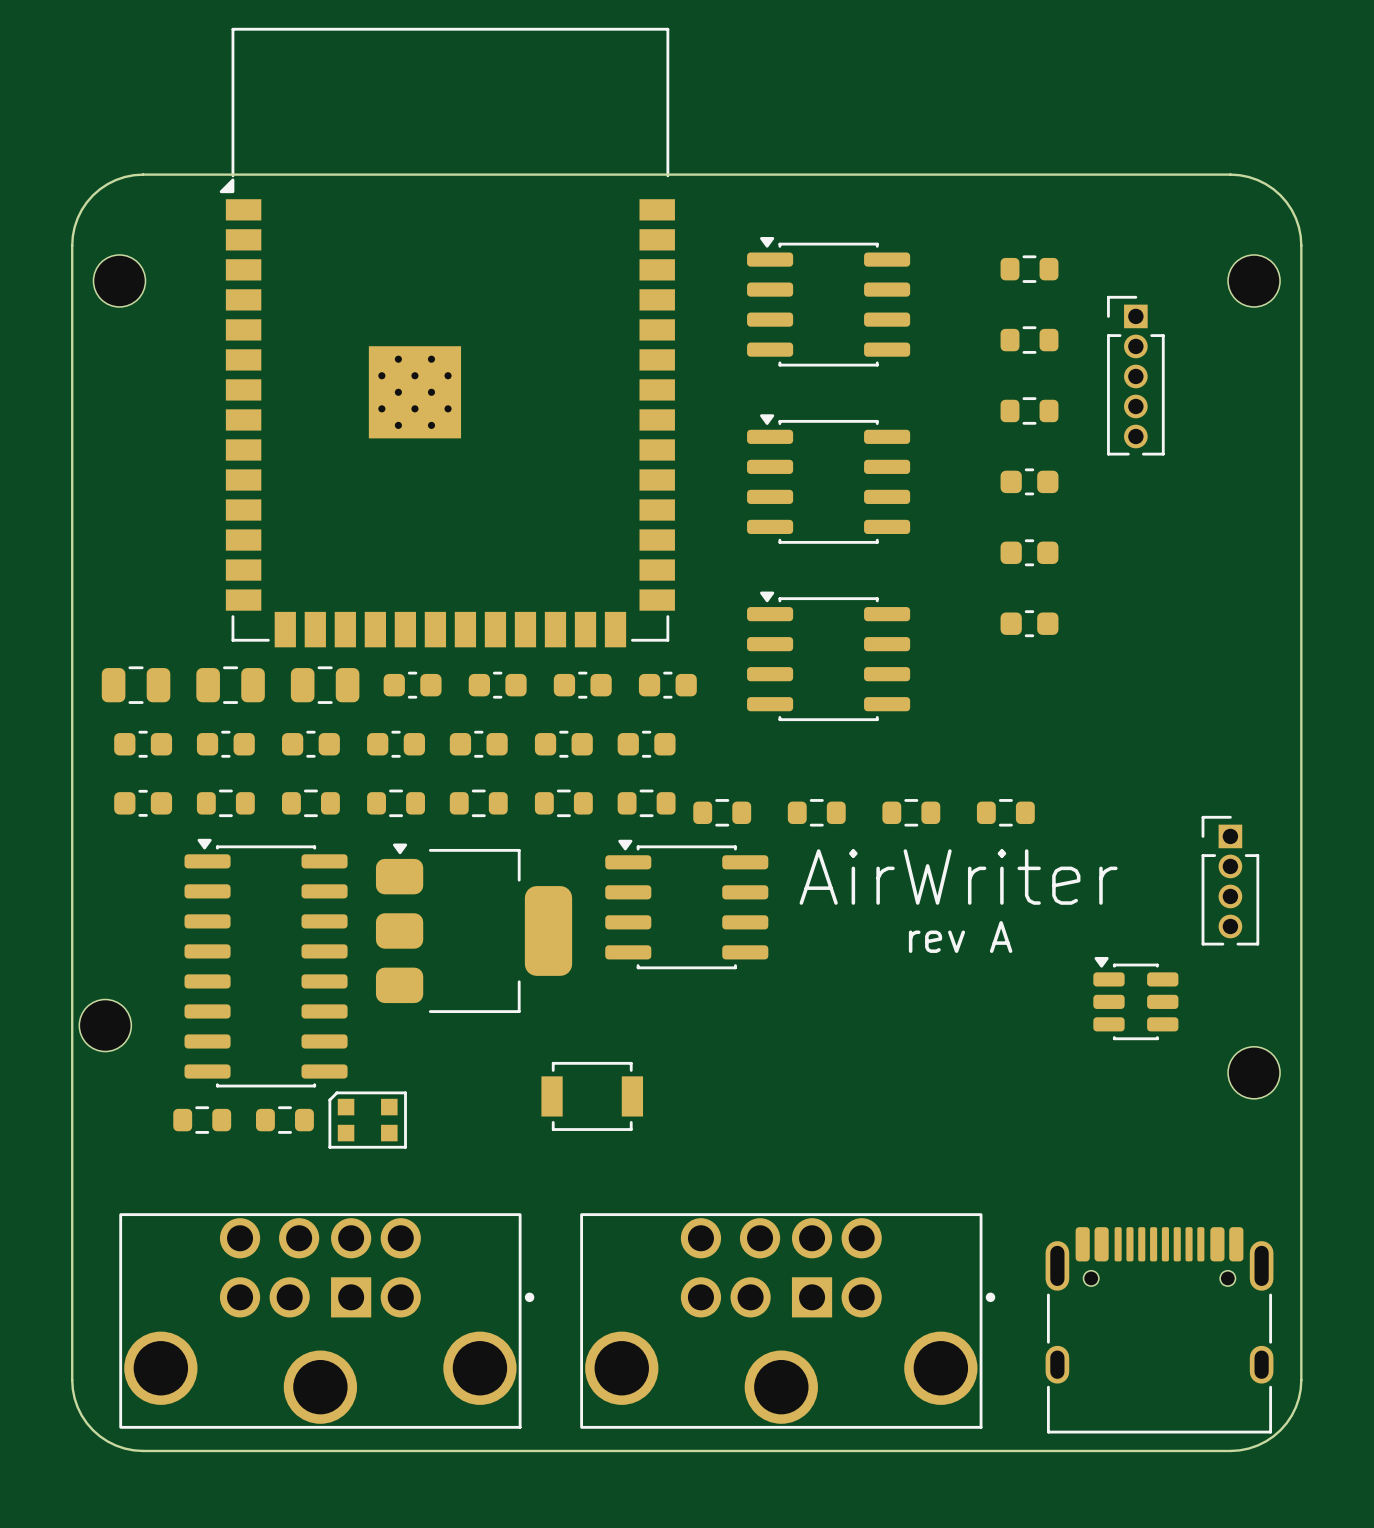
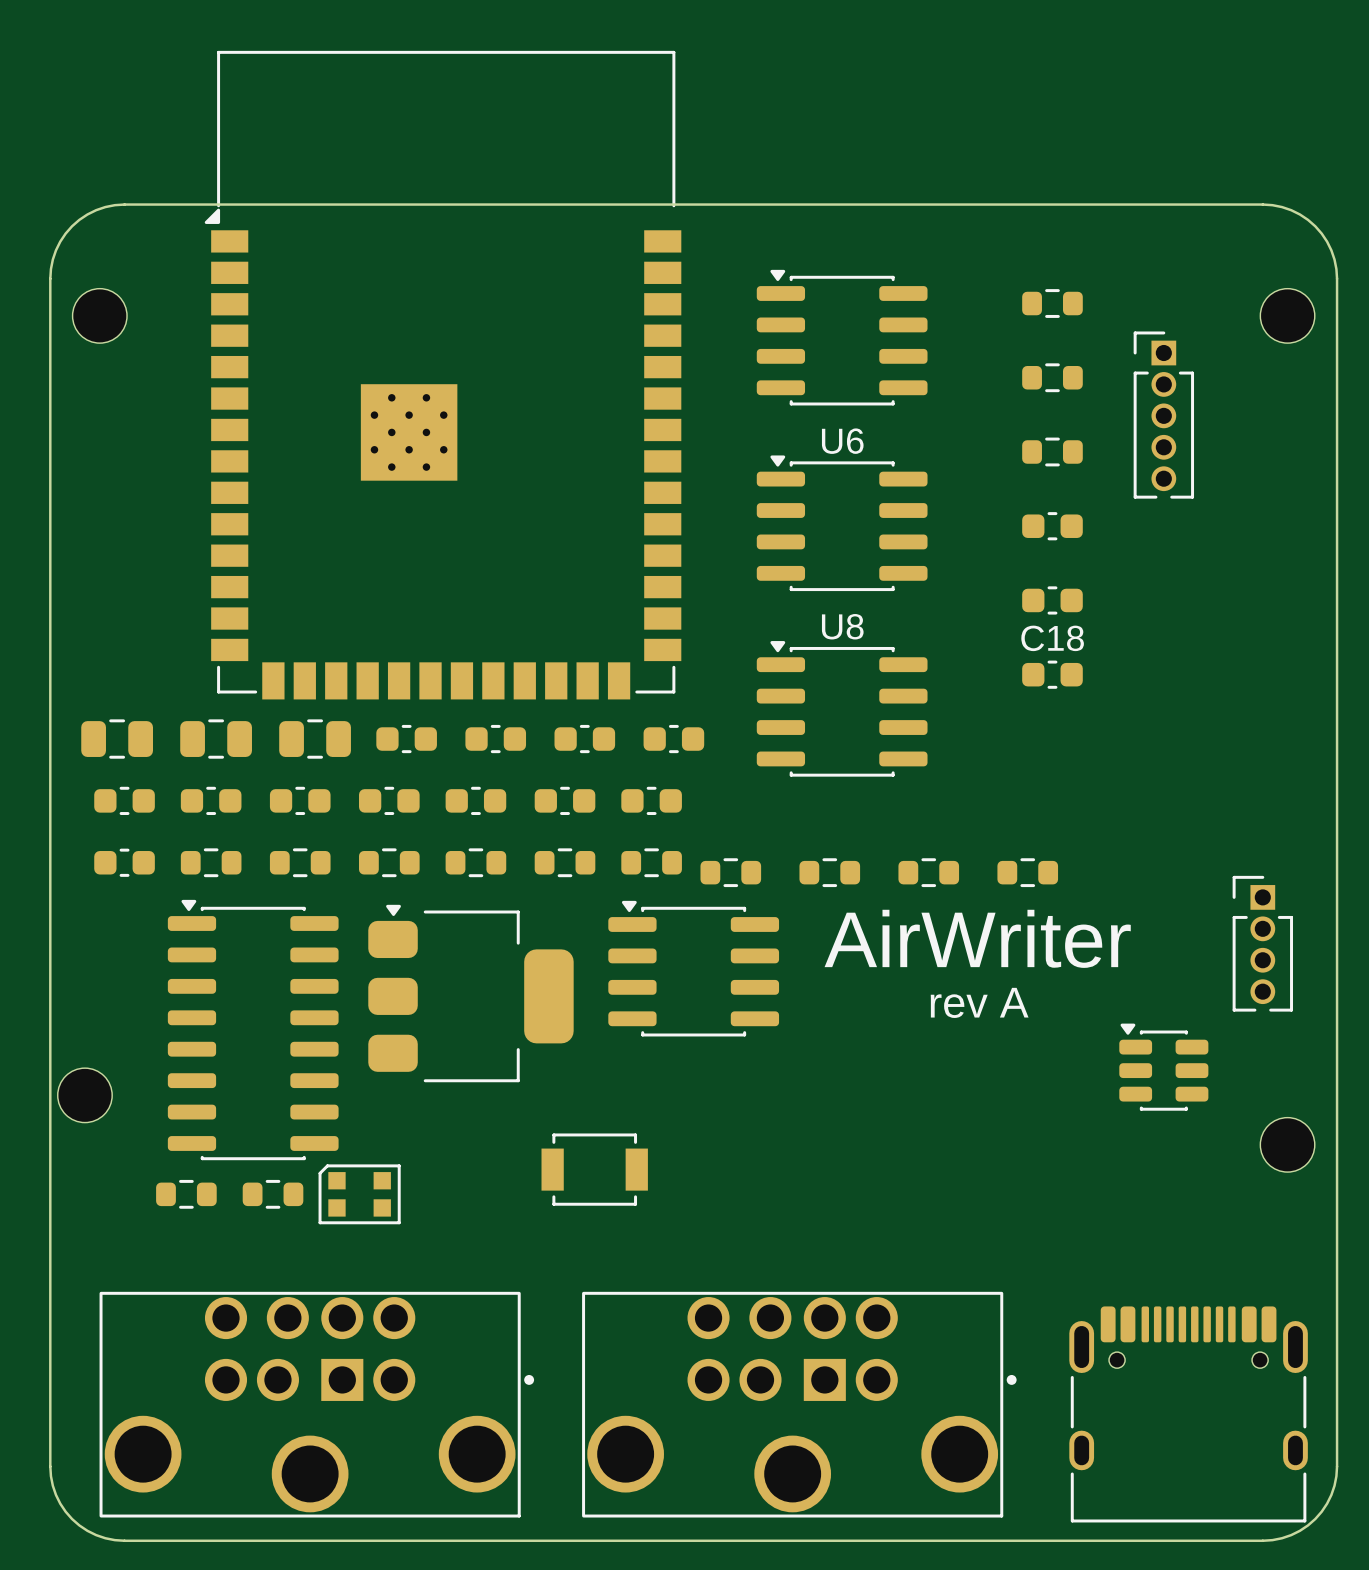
U6 name: none -> U6 (842, 441)
U8 name: none -> U8 (842, 626)
C18 name: none -> C18 (1052, 638)

